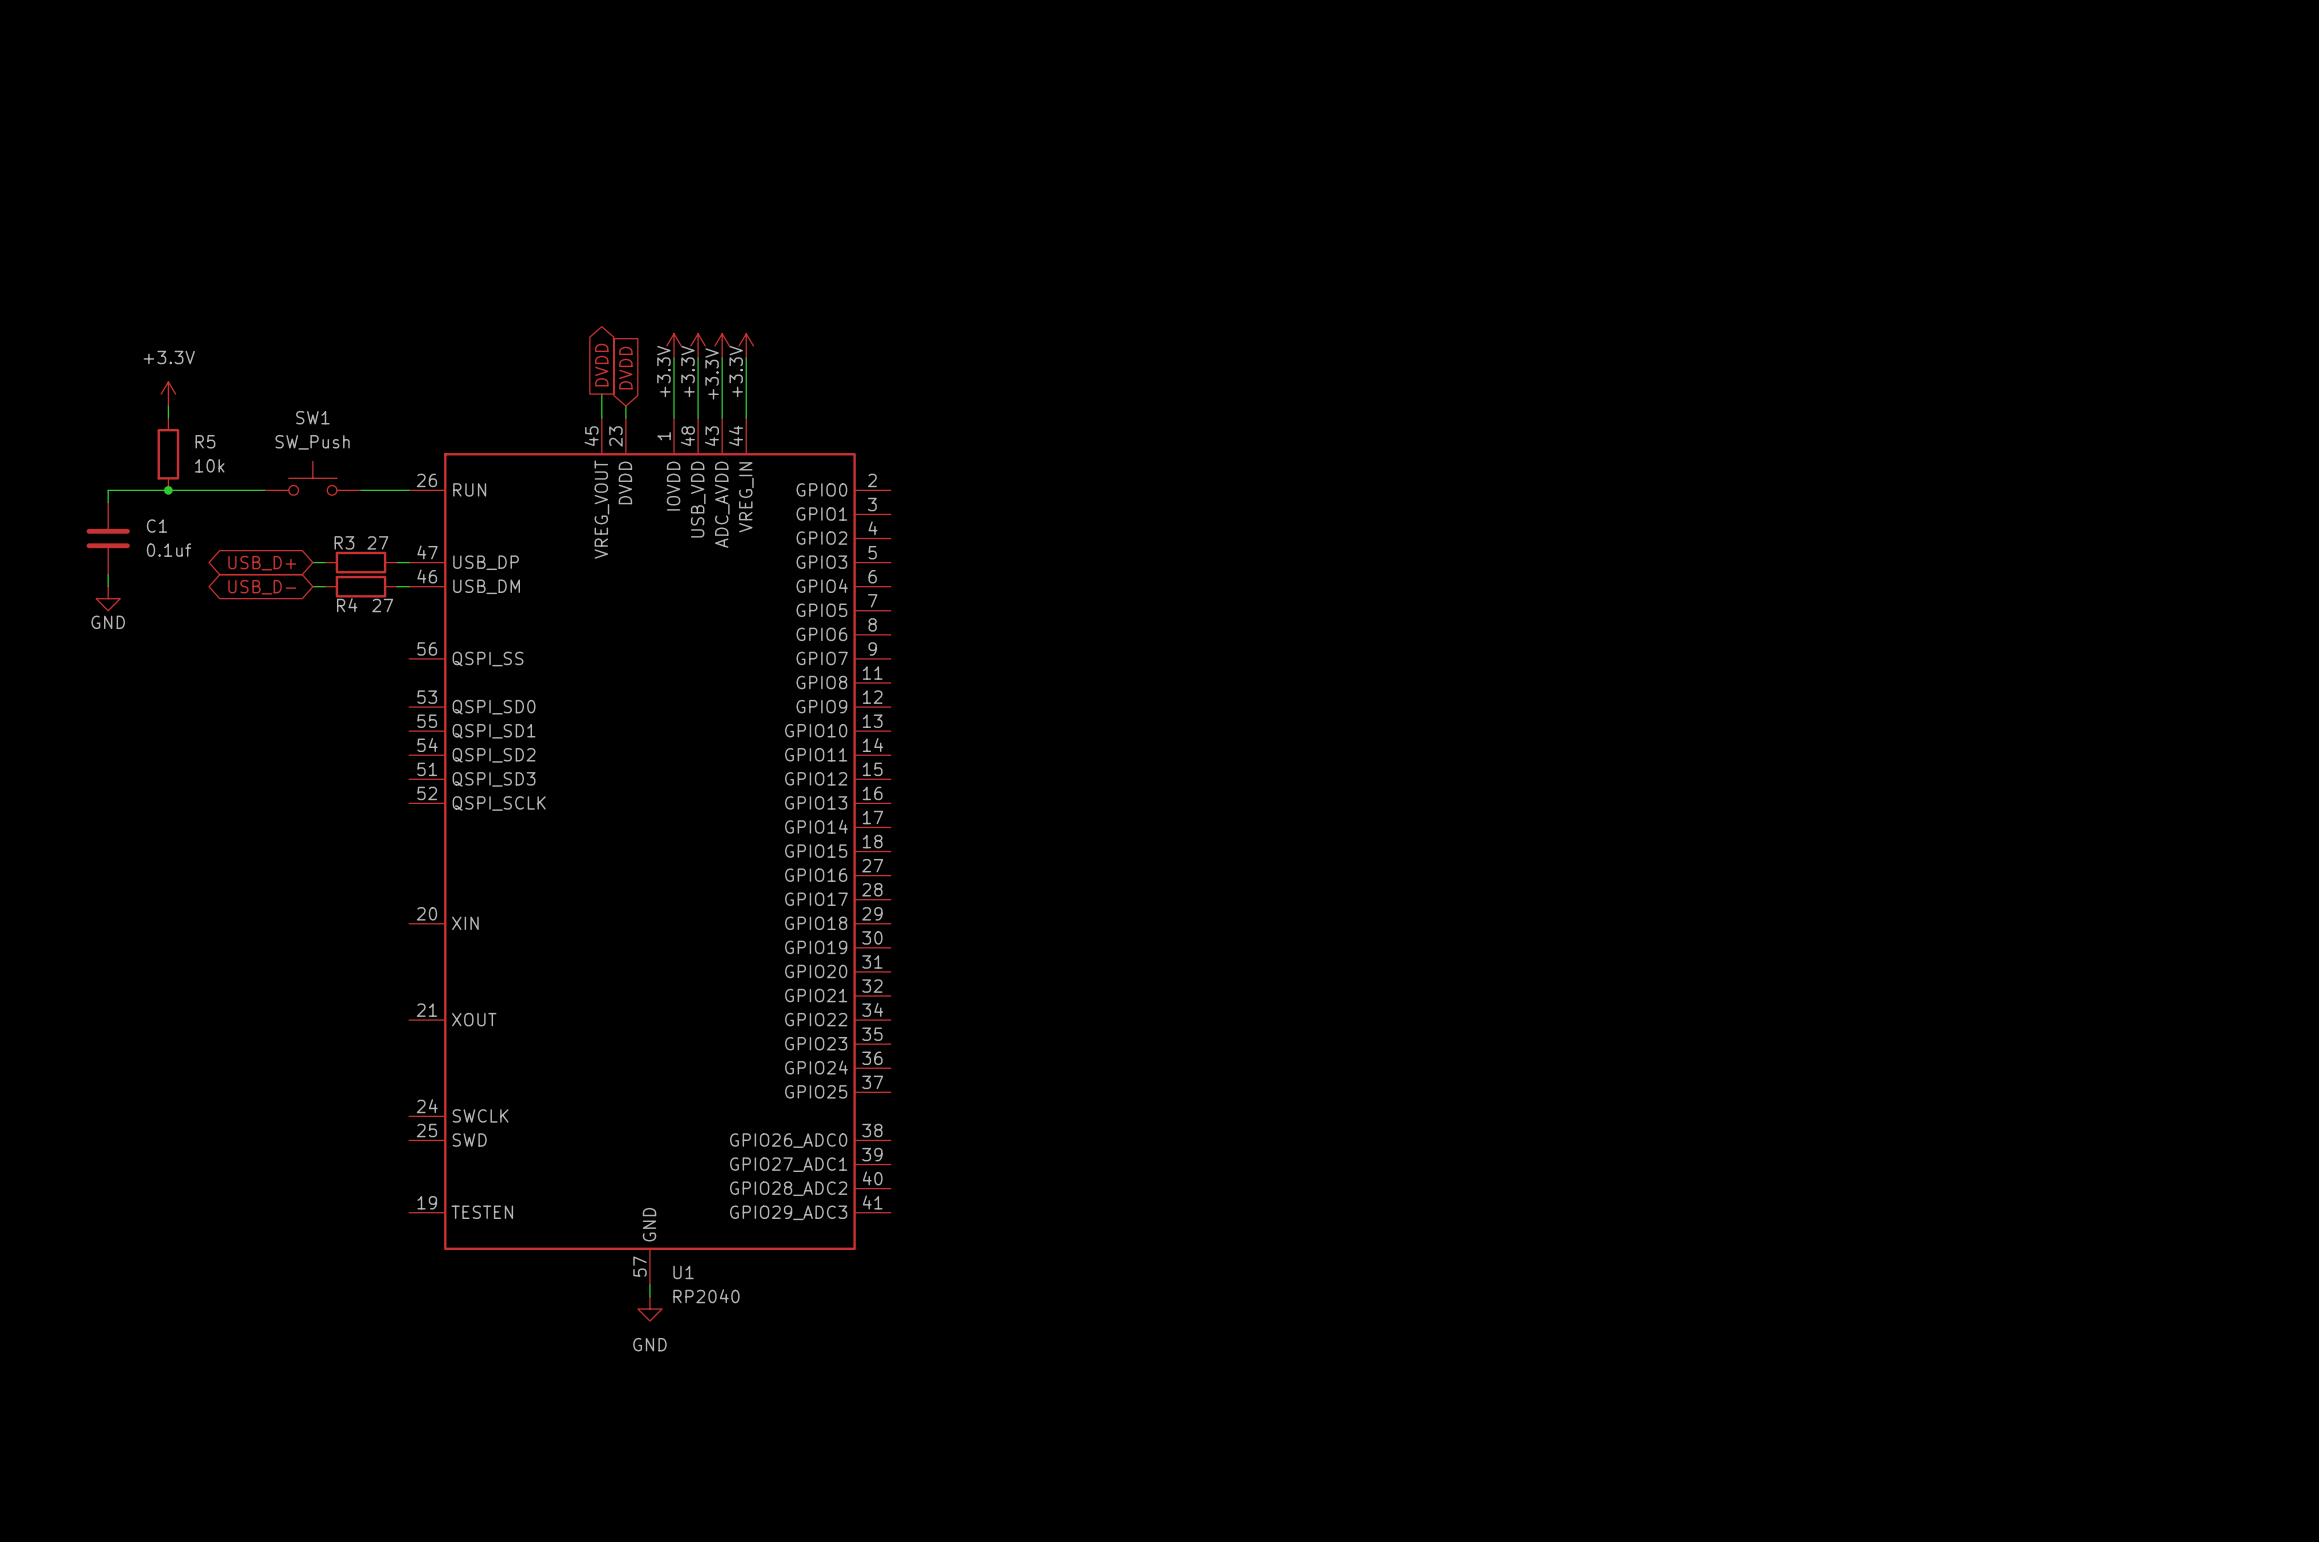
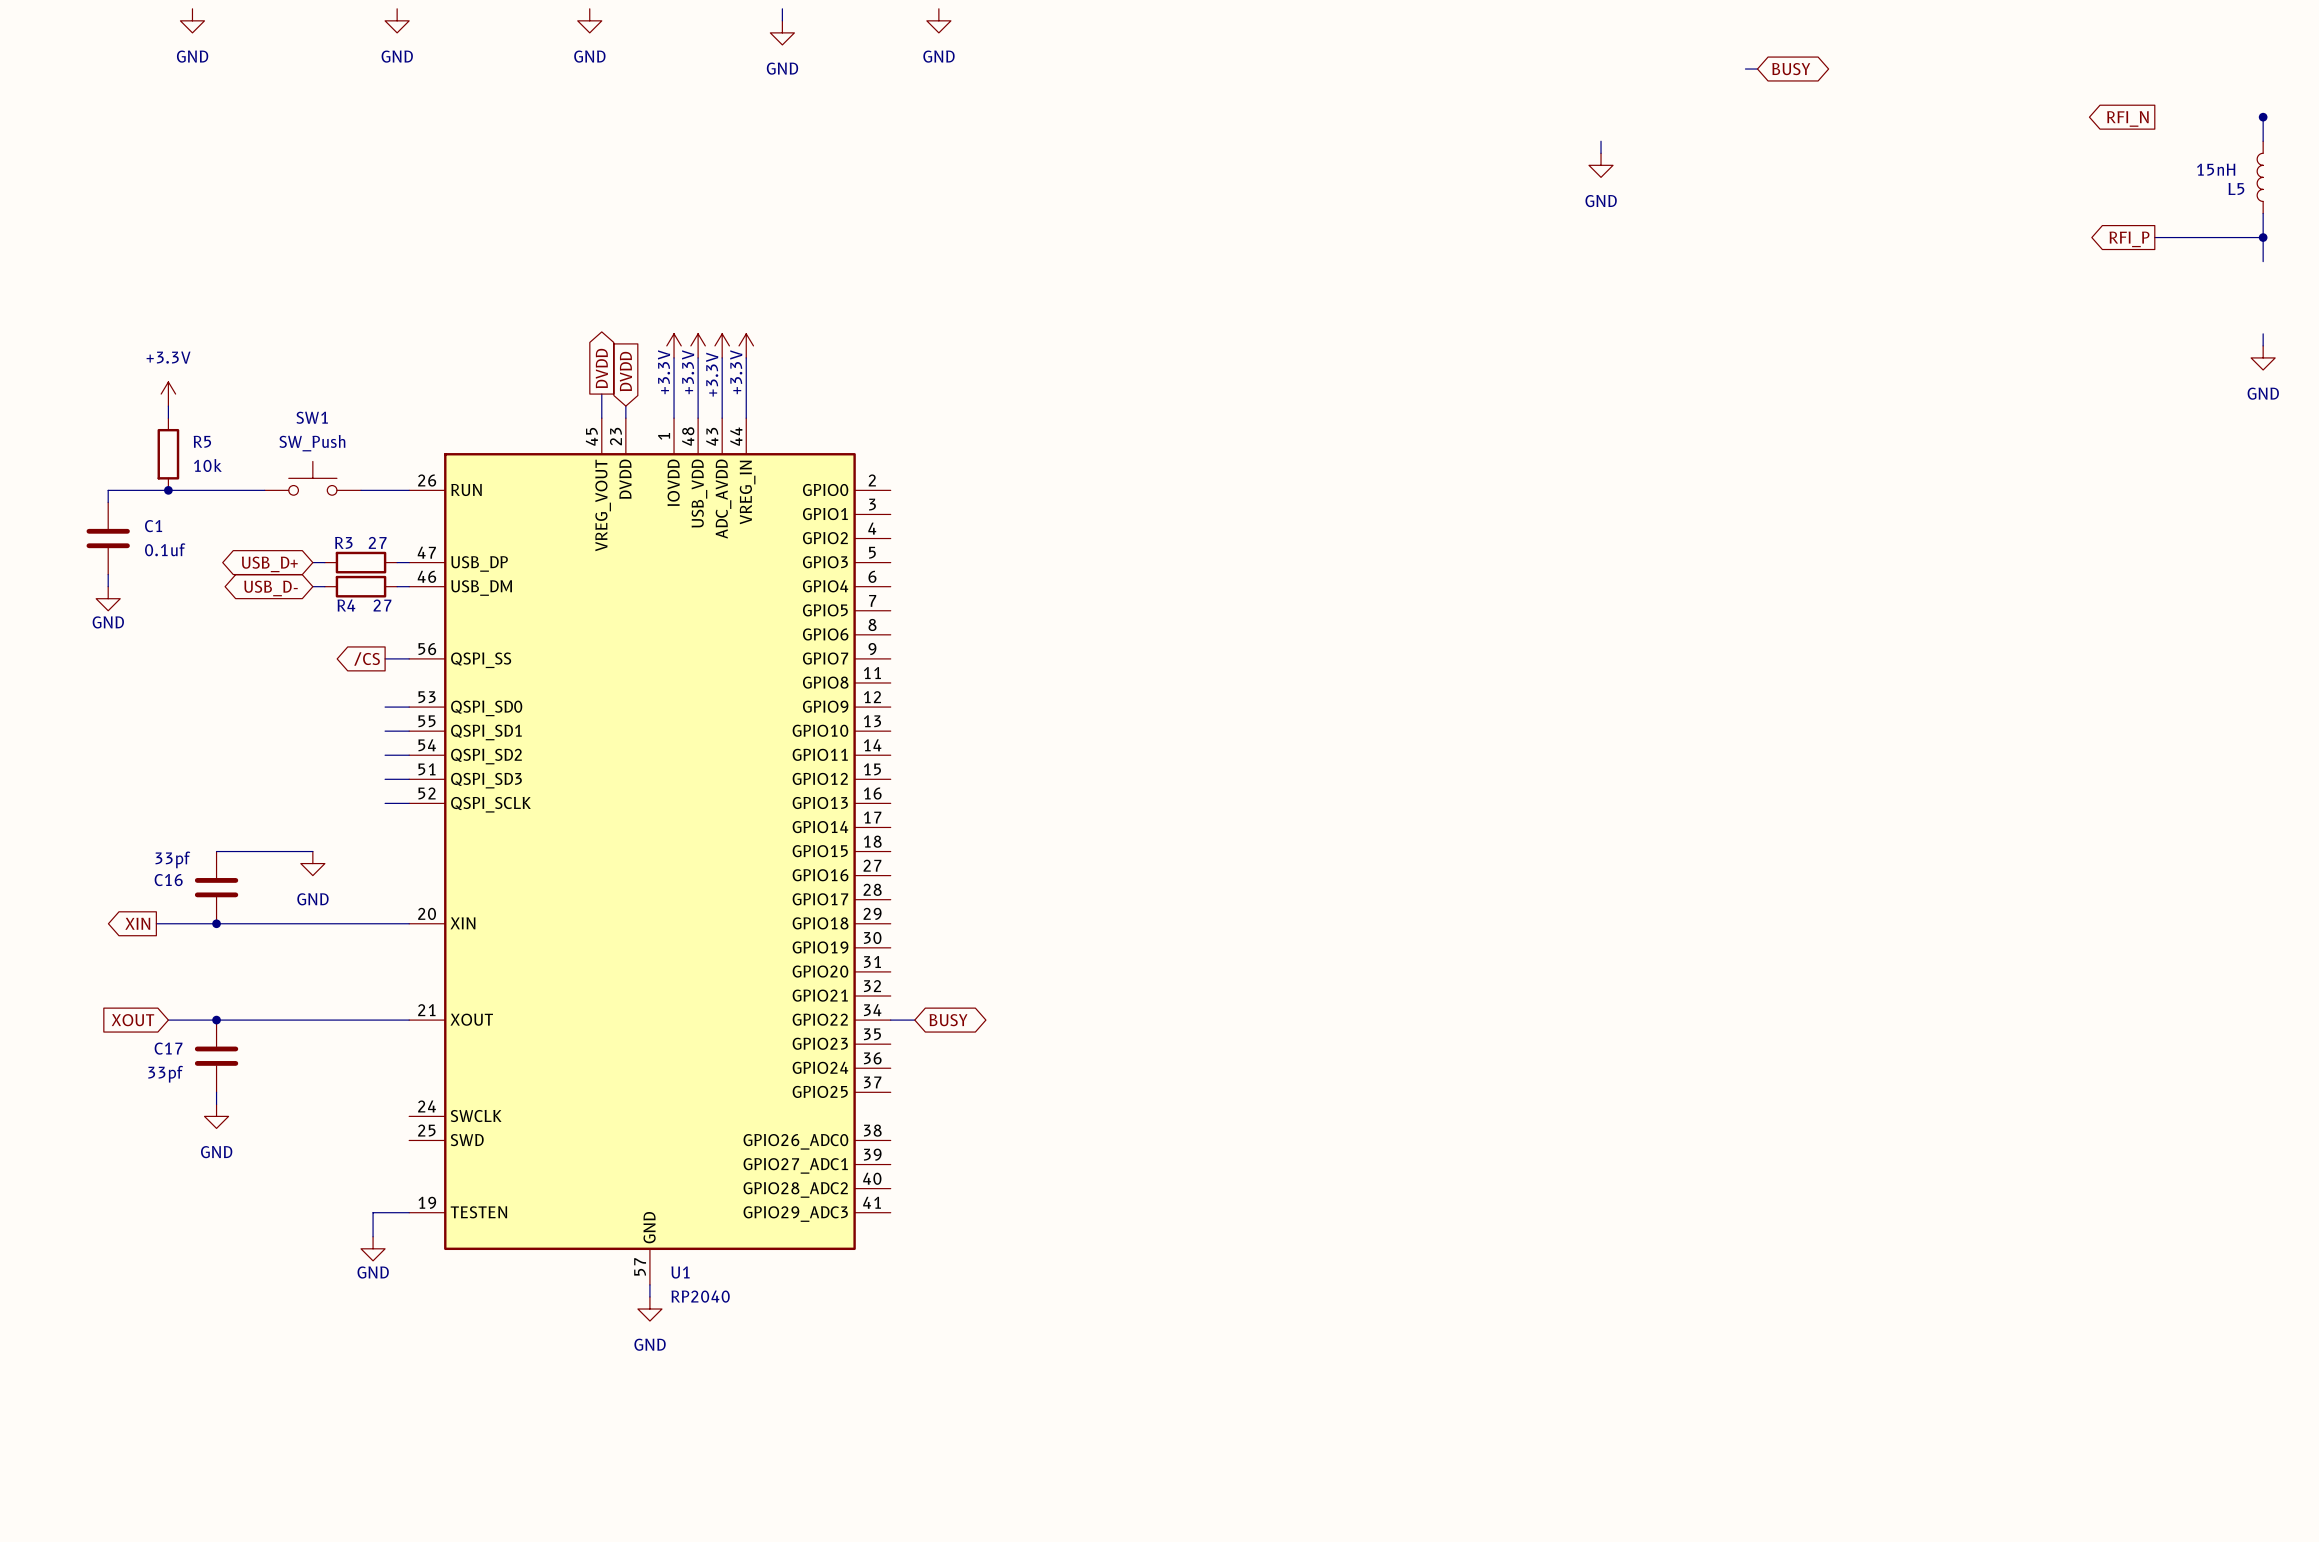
wire: none -> (782, 8) (782, 20)
power symbol: none -> GND (192, 20)
power symbol: none -> GND (397, 20)
power symbol: none -> GND (589, 20)
power symbol: none -> GND (938, 20)
power symbol: none -> GND (782, 32)
wire: none -> (1745, 69) (1757, 69)
global label: none -> BUSY (1791, 69)
global label: none -> RFI_N (2127, 118)
wire: none -> (2263, 117) (2263, 141)
junction: none -> (2263, 117)
wire: none -> (1601, 141) (1601, 153)
power symbol: none -> GND (1601, 165)
L5: none -> 15nH (2260, 177)
wire: none -> (2263, 213) (2263, 261)
wire: none -> (2154, 237) (2263, 237)
junction: none -> (2263, 237)
global label: none -> RFI_P (2129, 239)
wire: none -> (2263, 333) (2263, 345)
power symbol: none -> GND (2263, 357)
wire: none -> (385, 658) (409, 658)
global label: none -> /CS (367, 658)
wire: none -> (385, 707) (409, 707)
wire: none -> (385, 731) (409, 731)
wire: none -> (385, 755) (409, 755)
wire: none -> (385, 779) (409, 779)
wire: none -> (385, 803) (409, 803)
wire: none -> (216, 851) (312, 851)
power symbol: none -> GND (312, 863)
C16: none -> 33pf (216, 887)
global label: none -> XIN (137, 923)
wire: none -> (156, 923) (409, 923)
junction: none -> (216, 923)
global label: none -> XOUT (132, 1020)
wire: none -> (168, 1020) (409, 1020)
junction: none -> (216, 1020)
wire: none -> (890, 1020) (914, 1020)
global label: none -> BUSY (948, 1020)
C17: none -> 33pf (216, 1056)
wire: none -> (216, 1092) (216, 1104)
power symbol: none -> GND (216, 1116)
wire: none -> (409, 1212) (373, 1212) (373, 1236)
power symbol: none -> GND (373, 1248)

